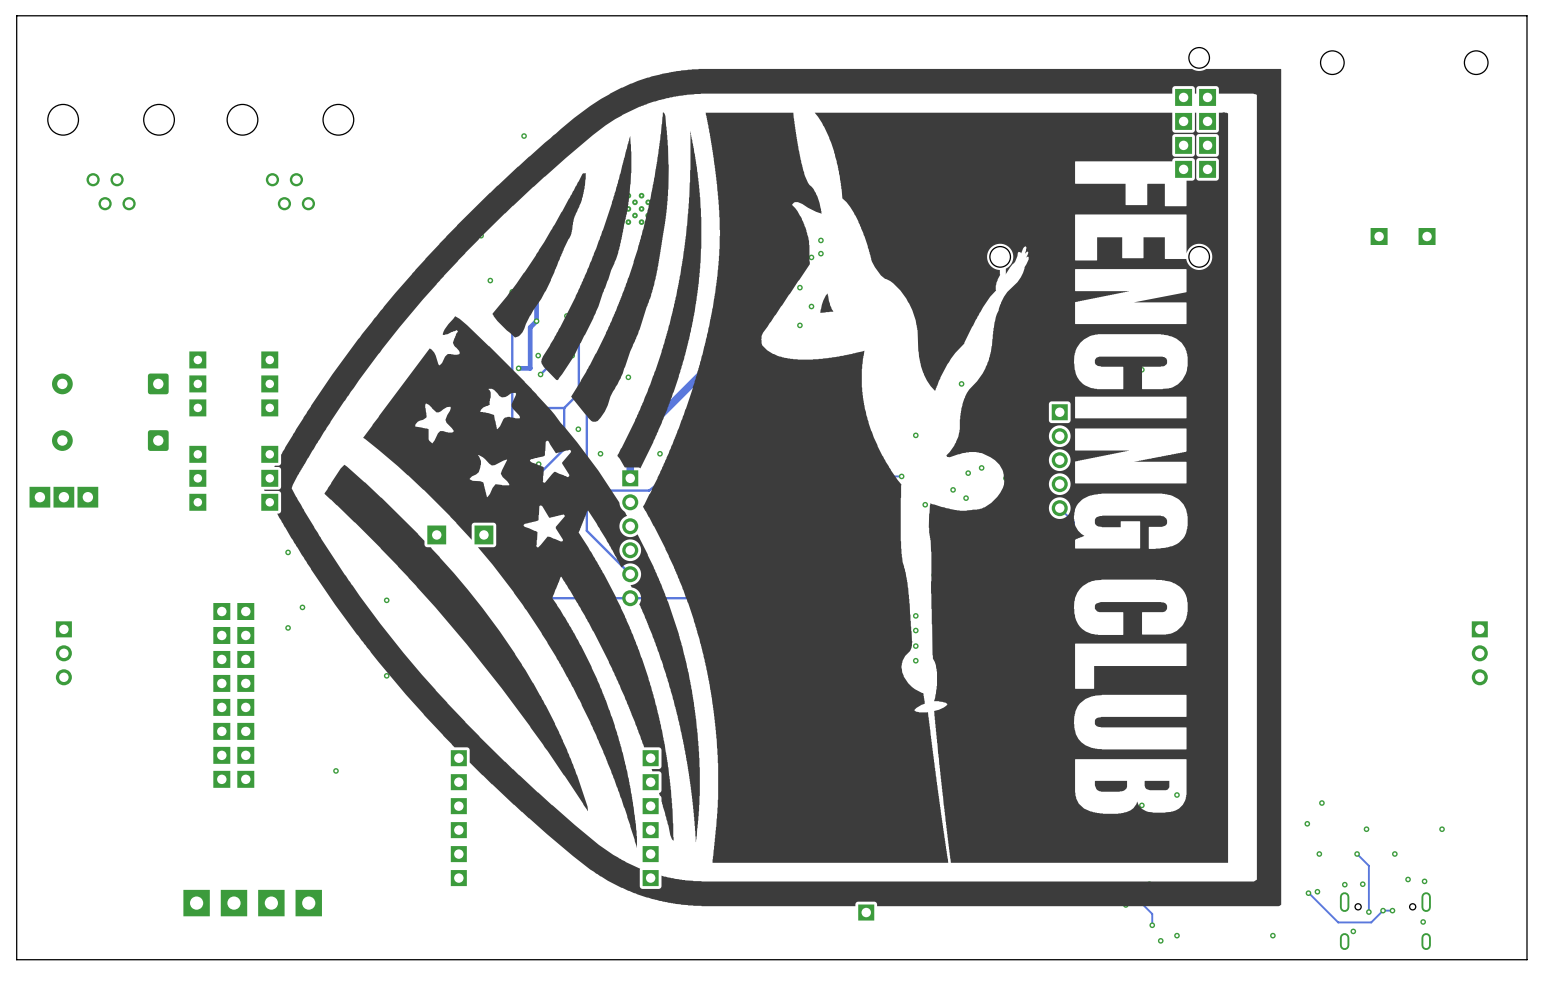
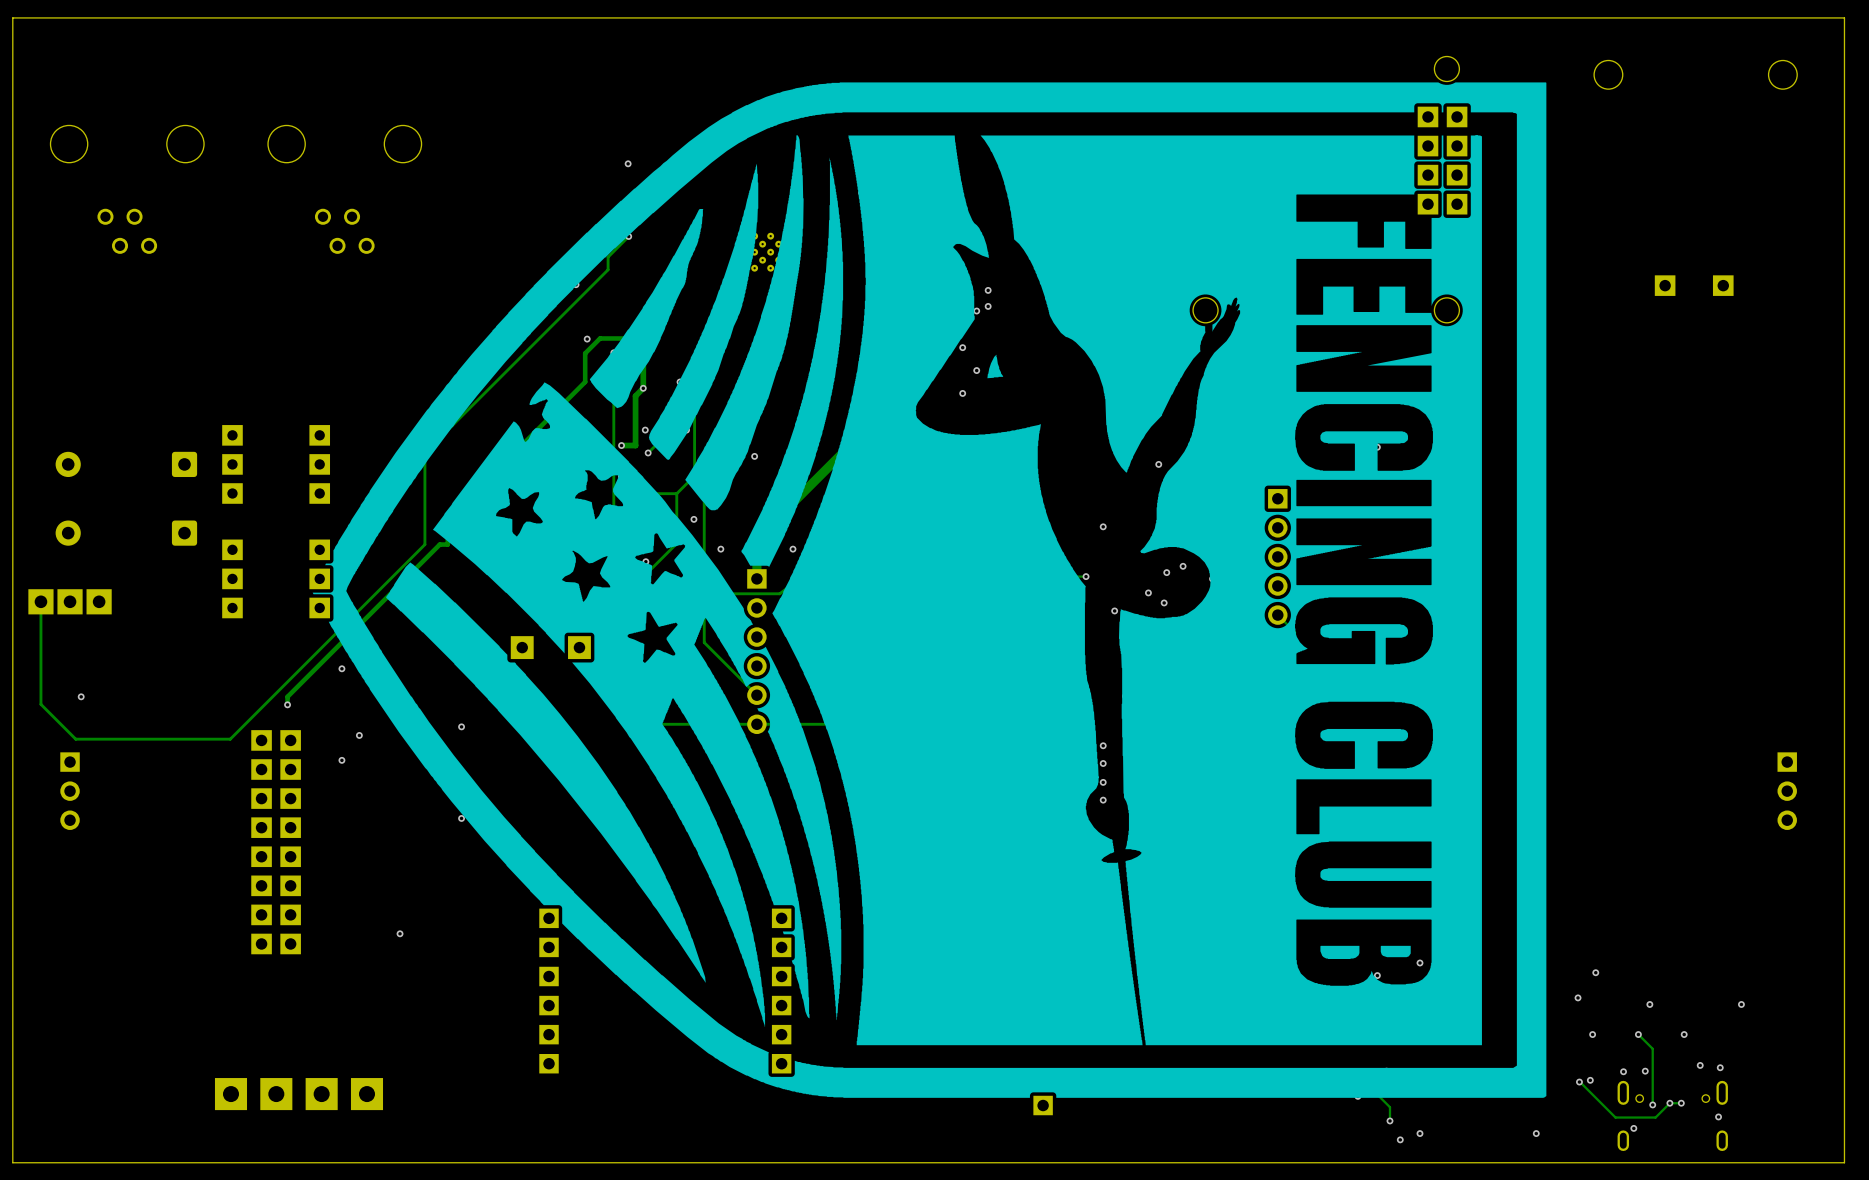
track: none -> (628, 236) (608, 257) (608, 269) (424, 452) (424, 544) (230, 739) (75, 739) (40, 704) (40, 601)
via: none -> (628, 236)
track: none -> (628, 338) (600, 338) (585, 353) (585, 381) (447, 519) (447, 544) (439, 544) (287, 696) (287, 704)
via: none -> (81, 696)
via: none -> (287, 704)

